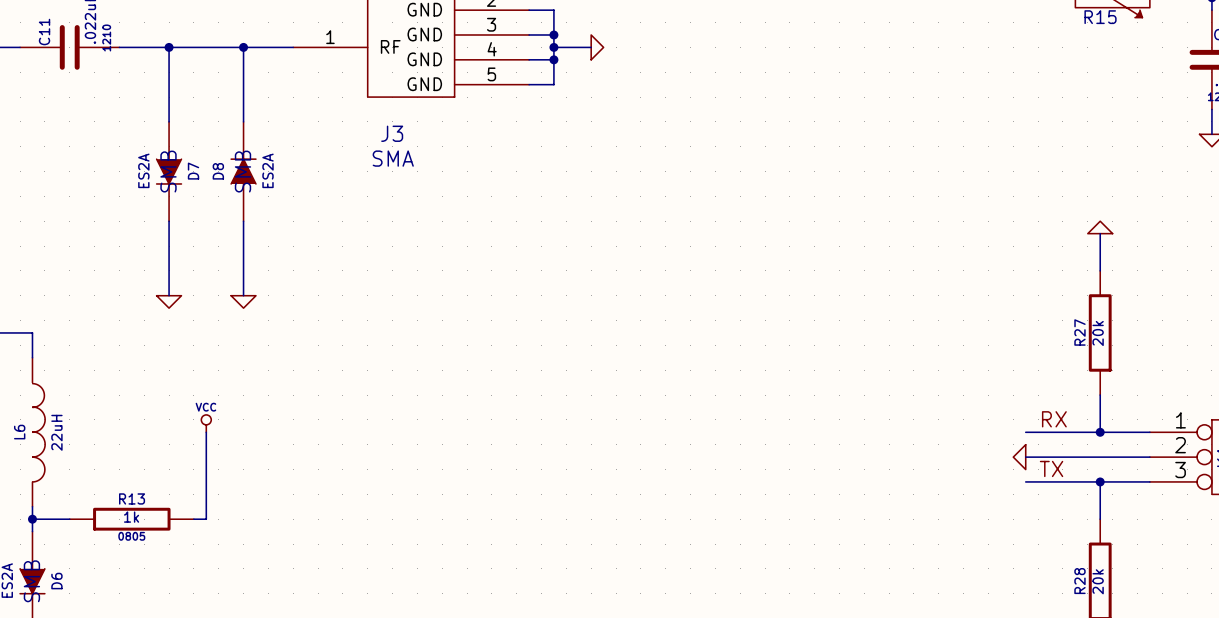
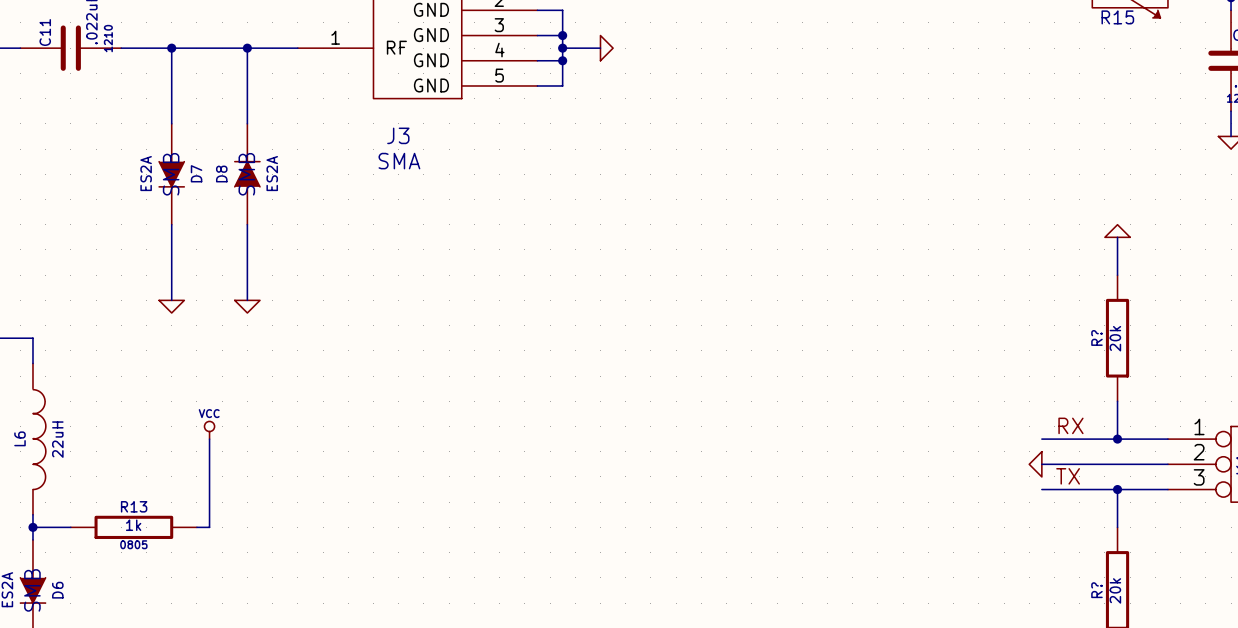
R27 name: R27 (1079, 332) -> R? (1096, 337)
R28 name: R28 (1079, 581) -> R? (1096, 590)

